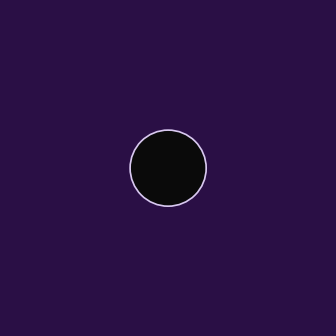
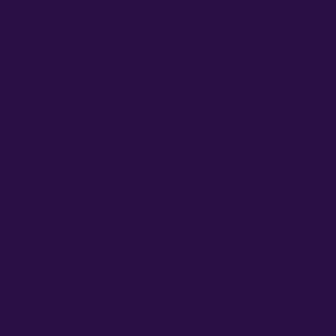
part: (168, 168) -> none

